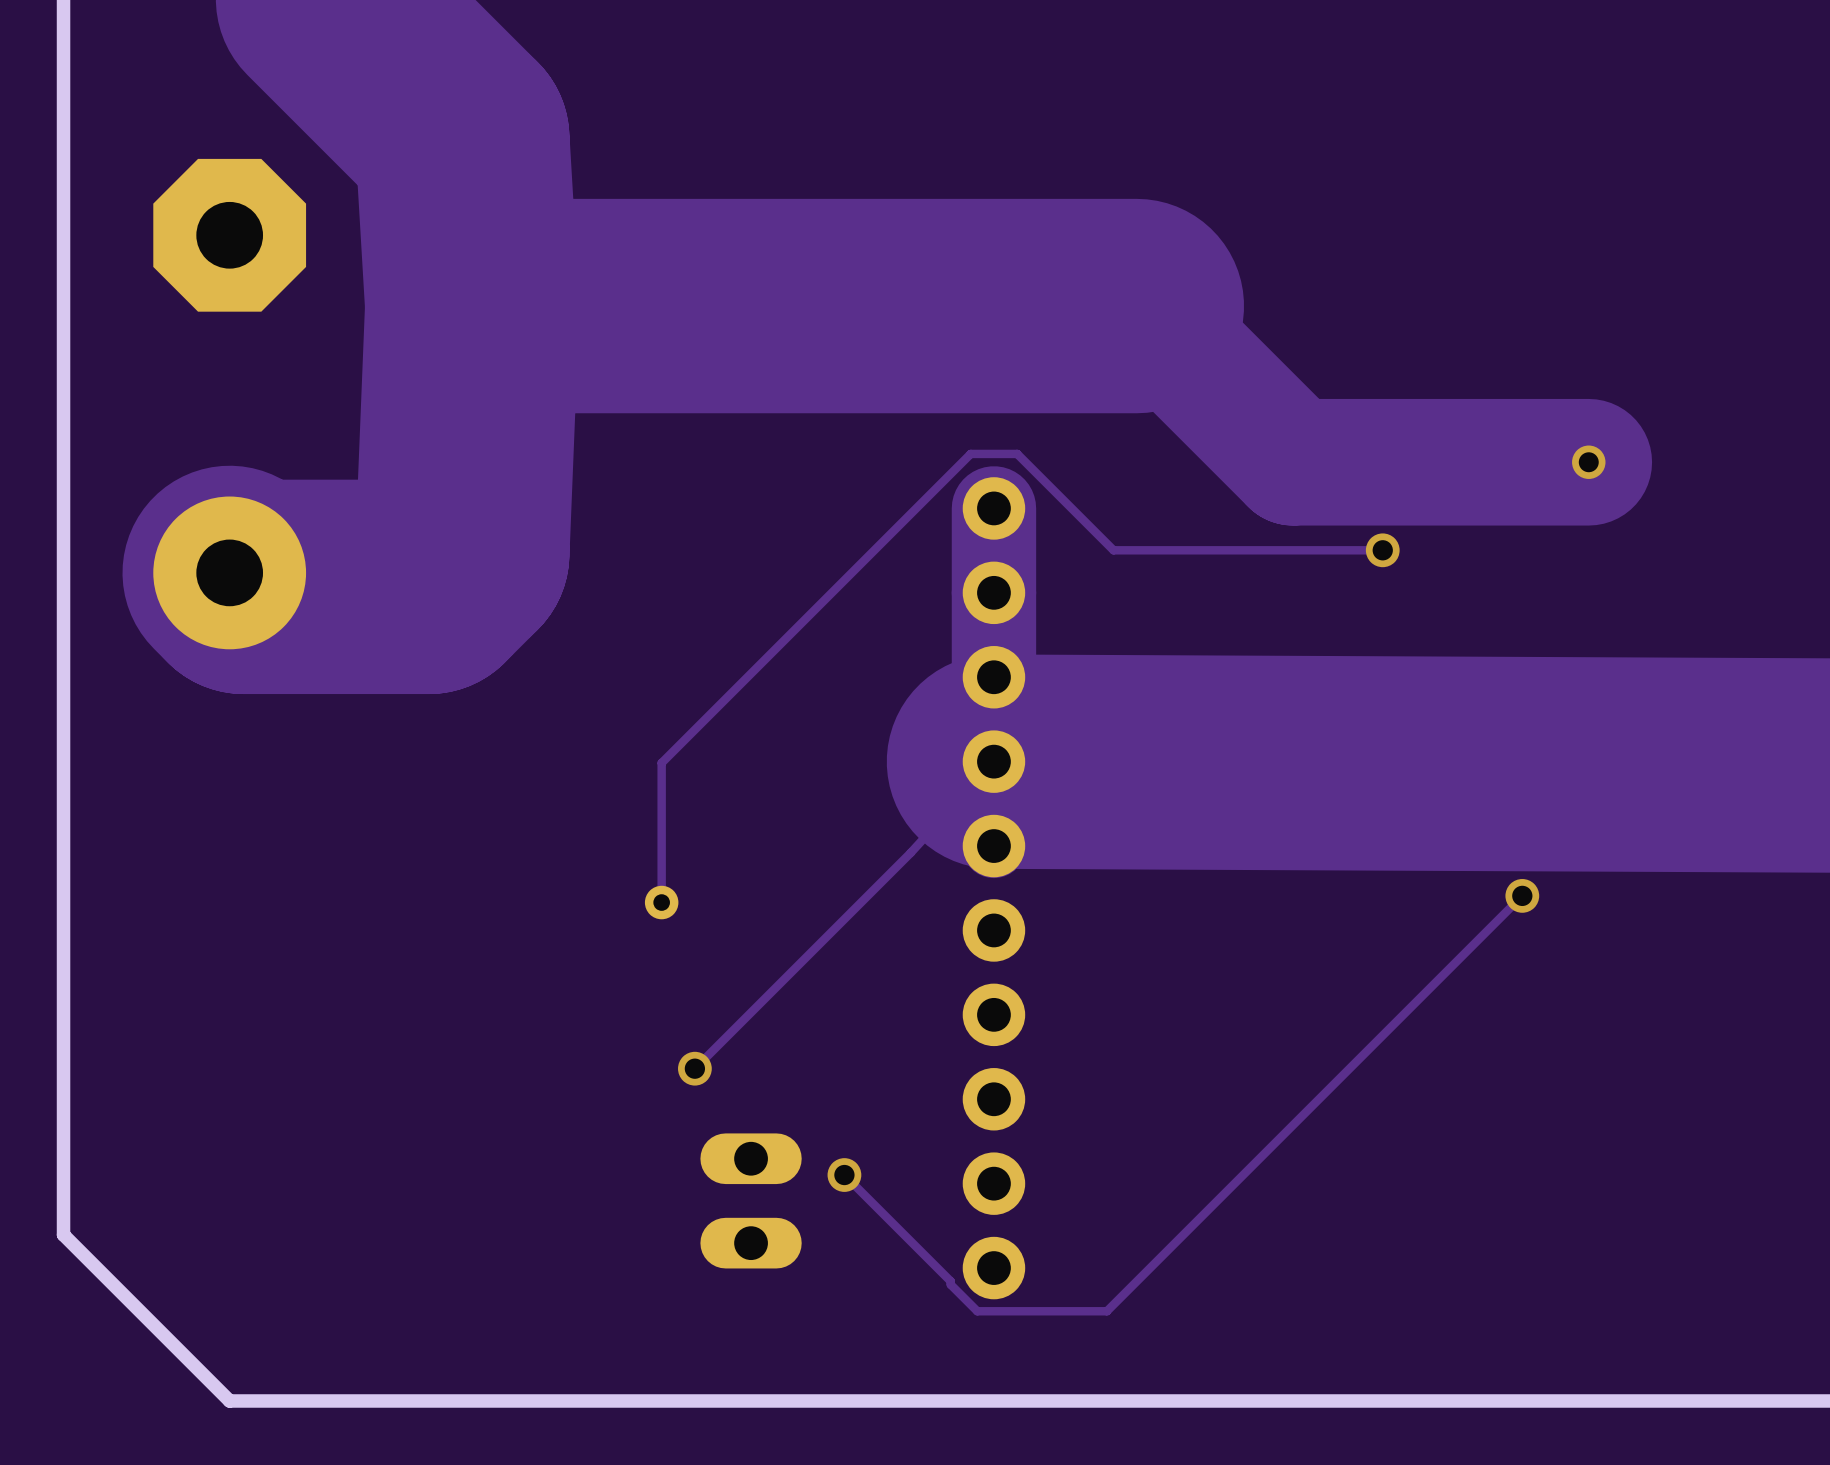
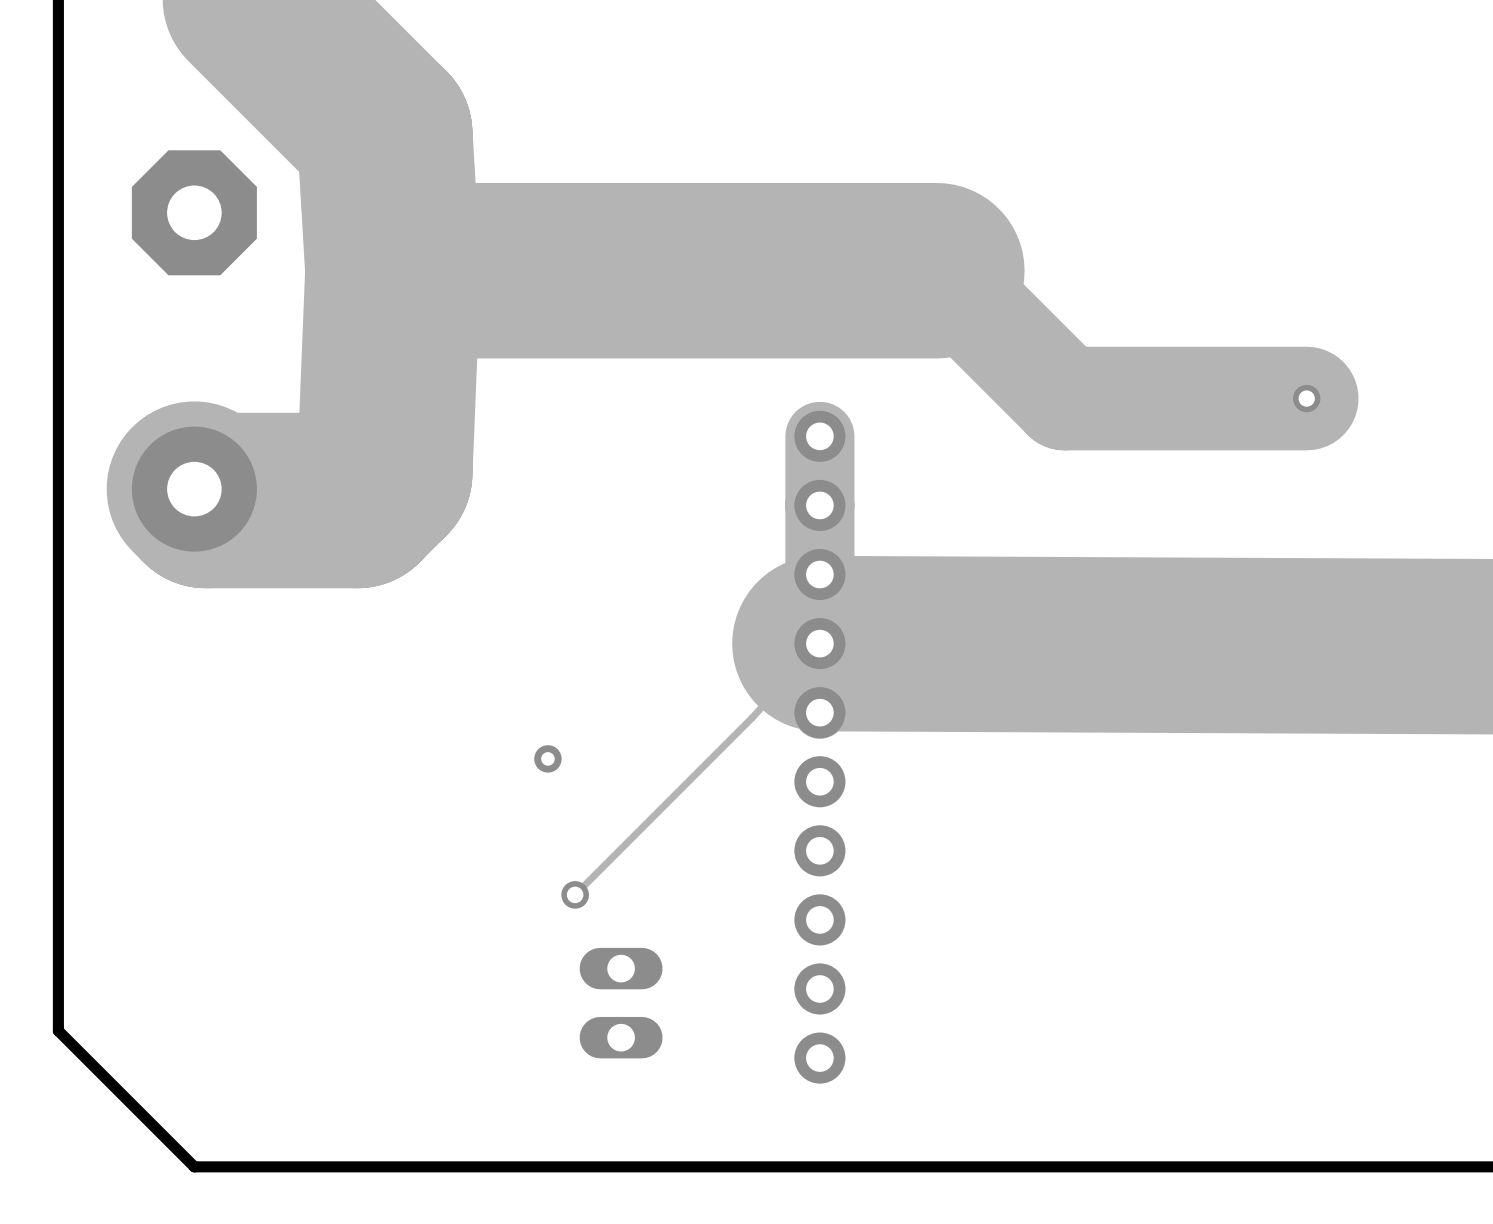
track: (1382, 550) (1113, 550) (1017, 453) (970, 453) (661, 762) (661, 902) -> none
via: (1382, 550) -> none
track: (1522, 895) (1106, 1311) (977, 1311) (950, 1284) (950, 1281) (844, 1175) -> none
via: (1522, 895) -> none
via: (844, 1175) -> none

